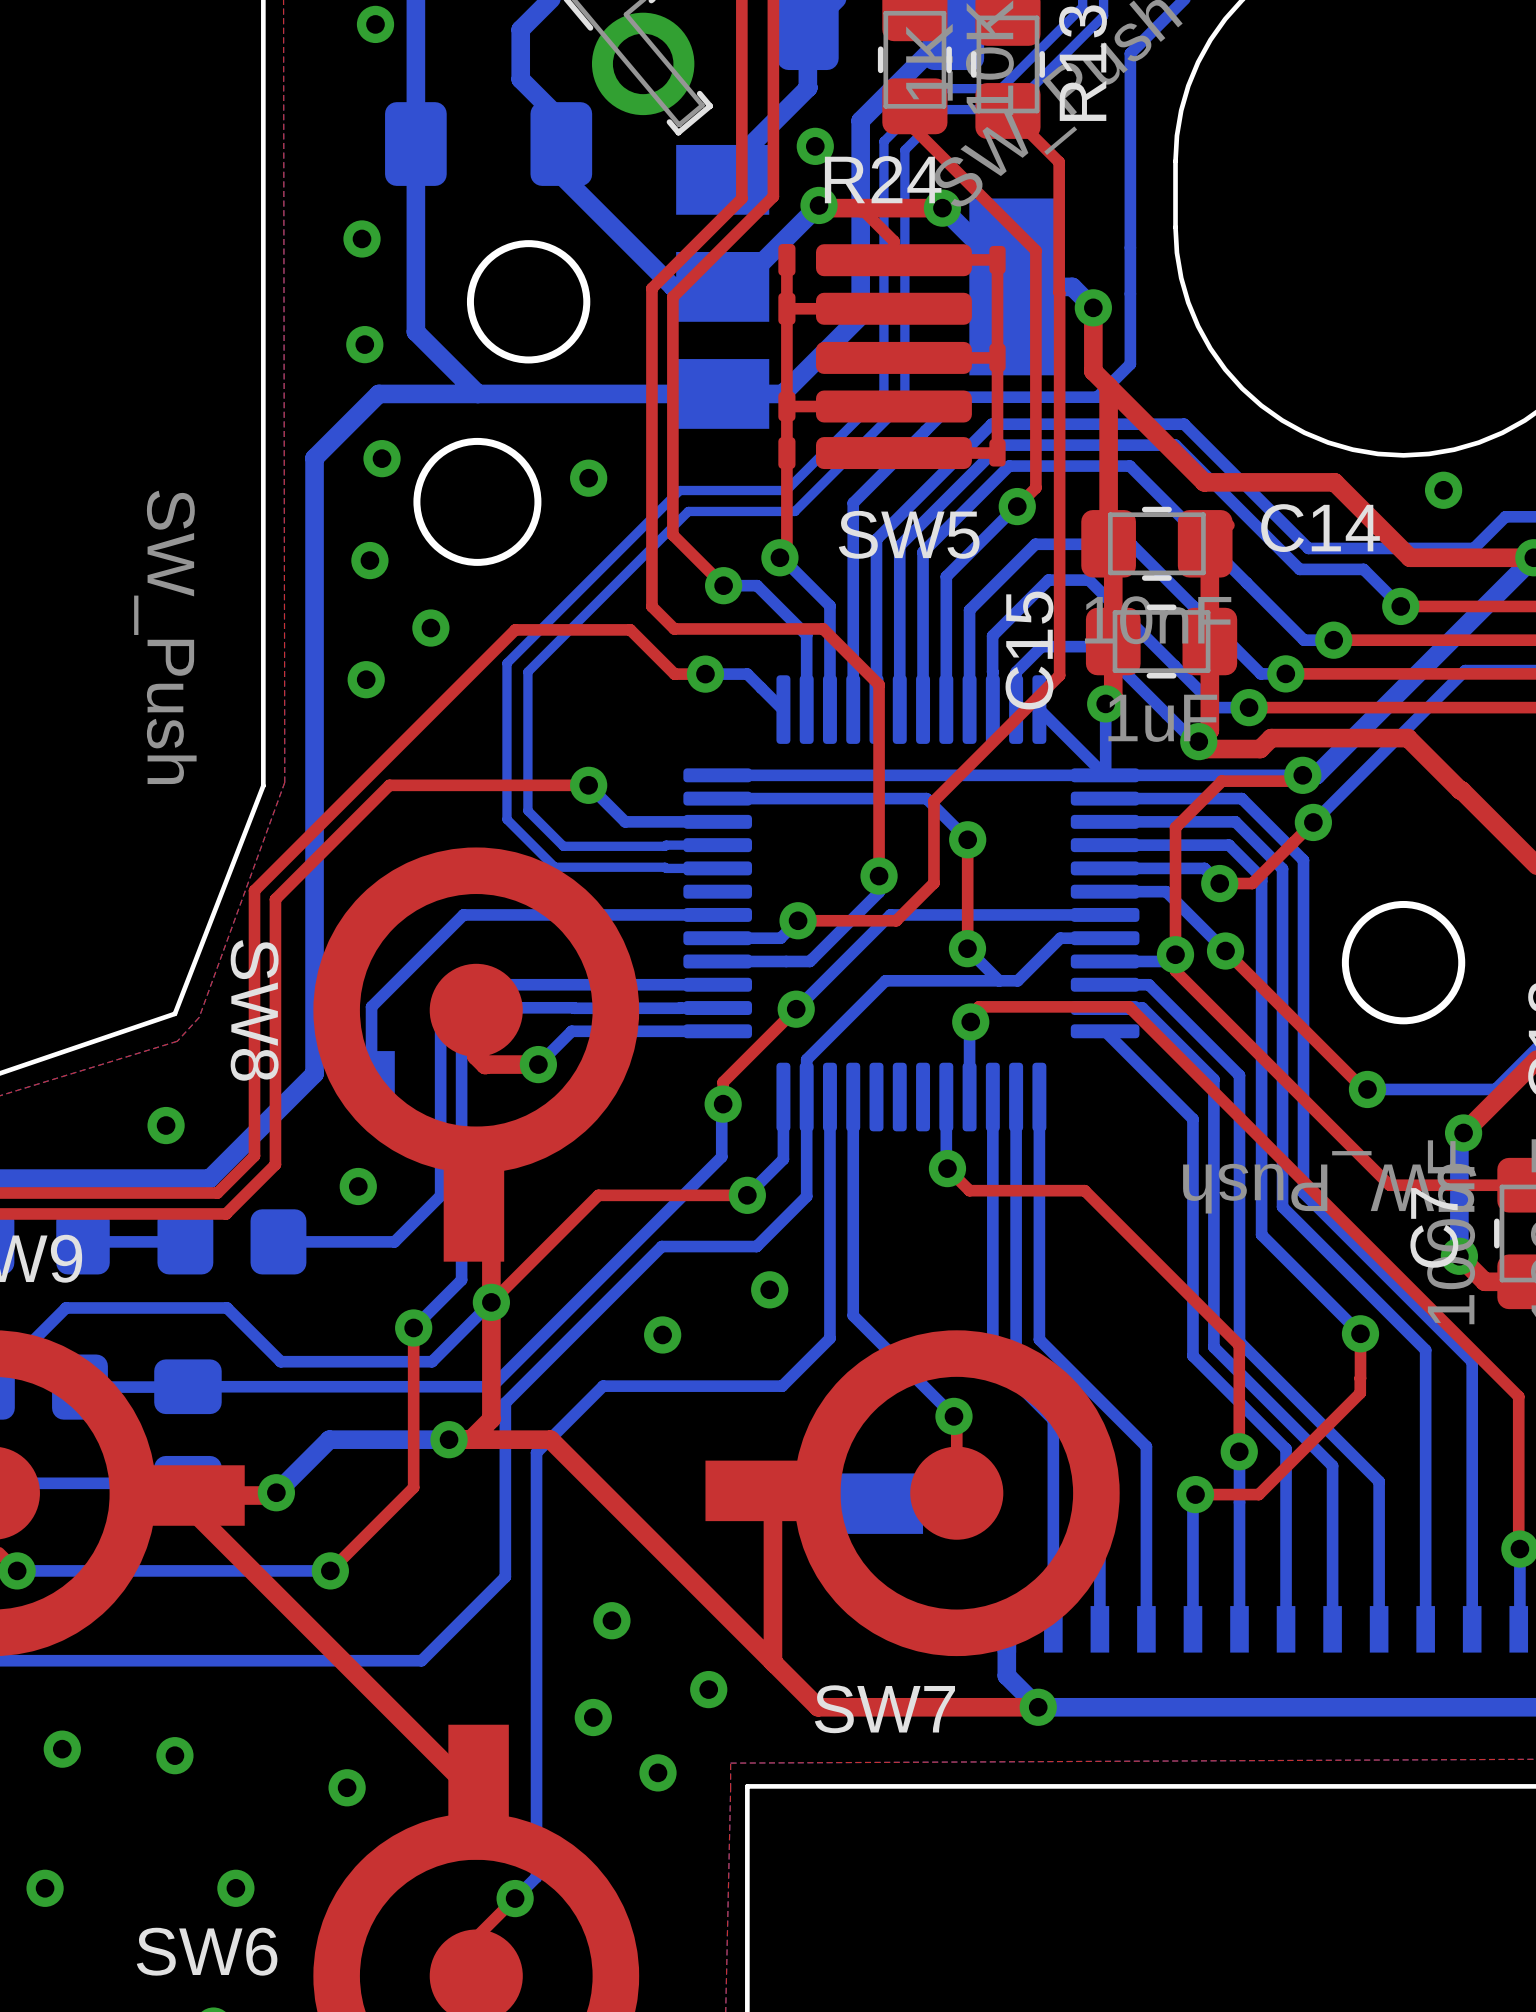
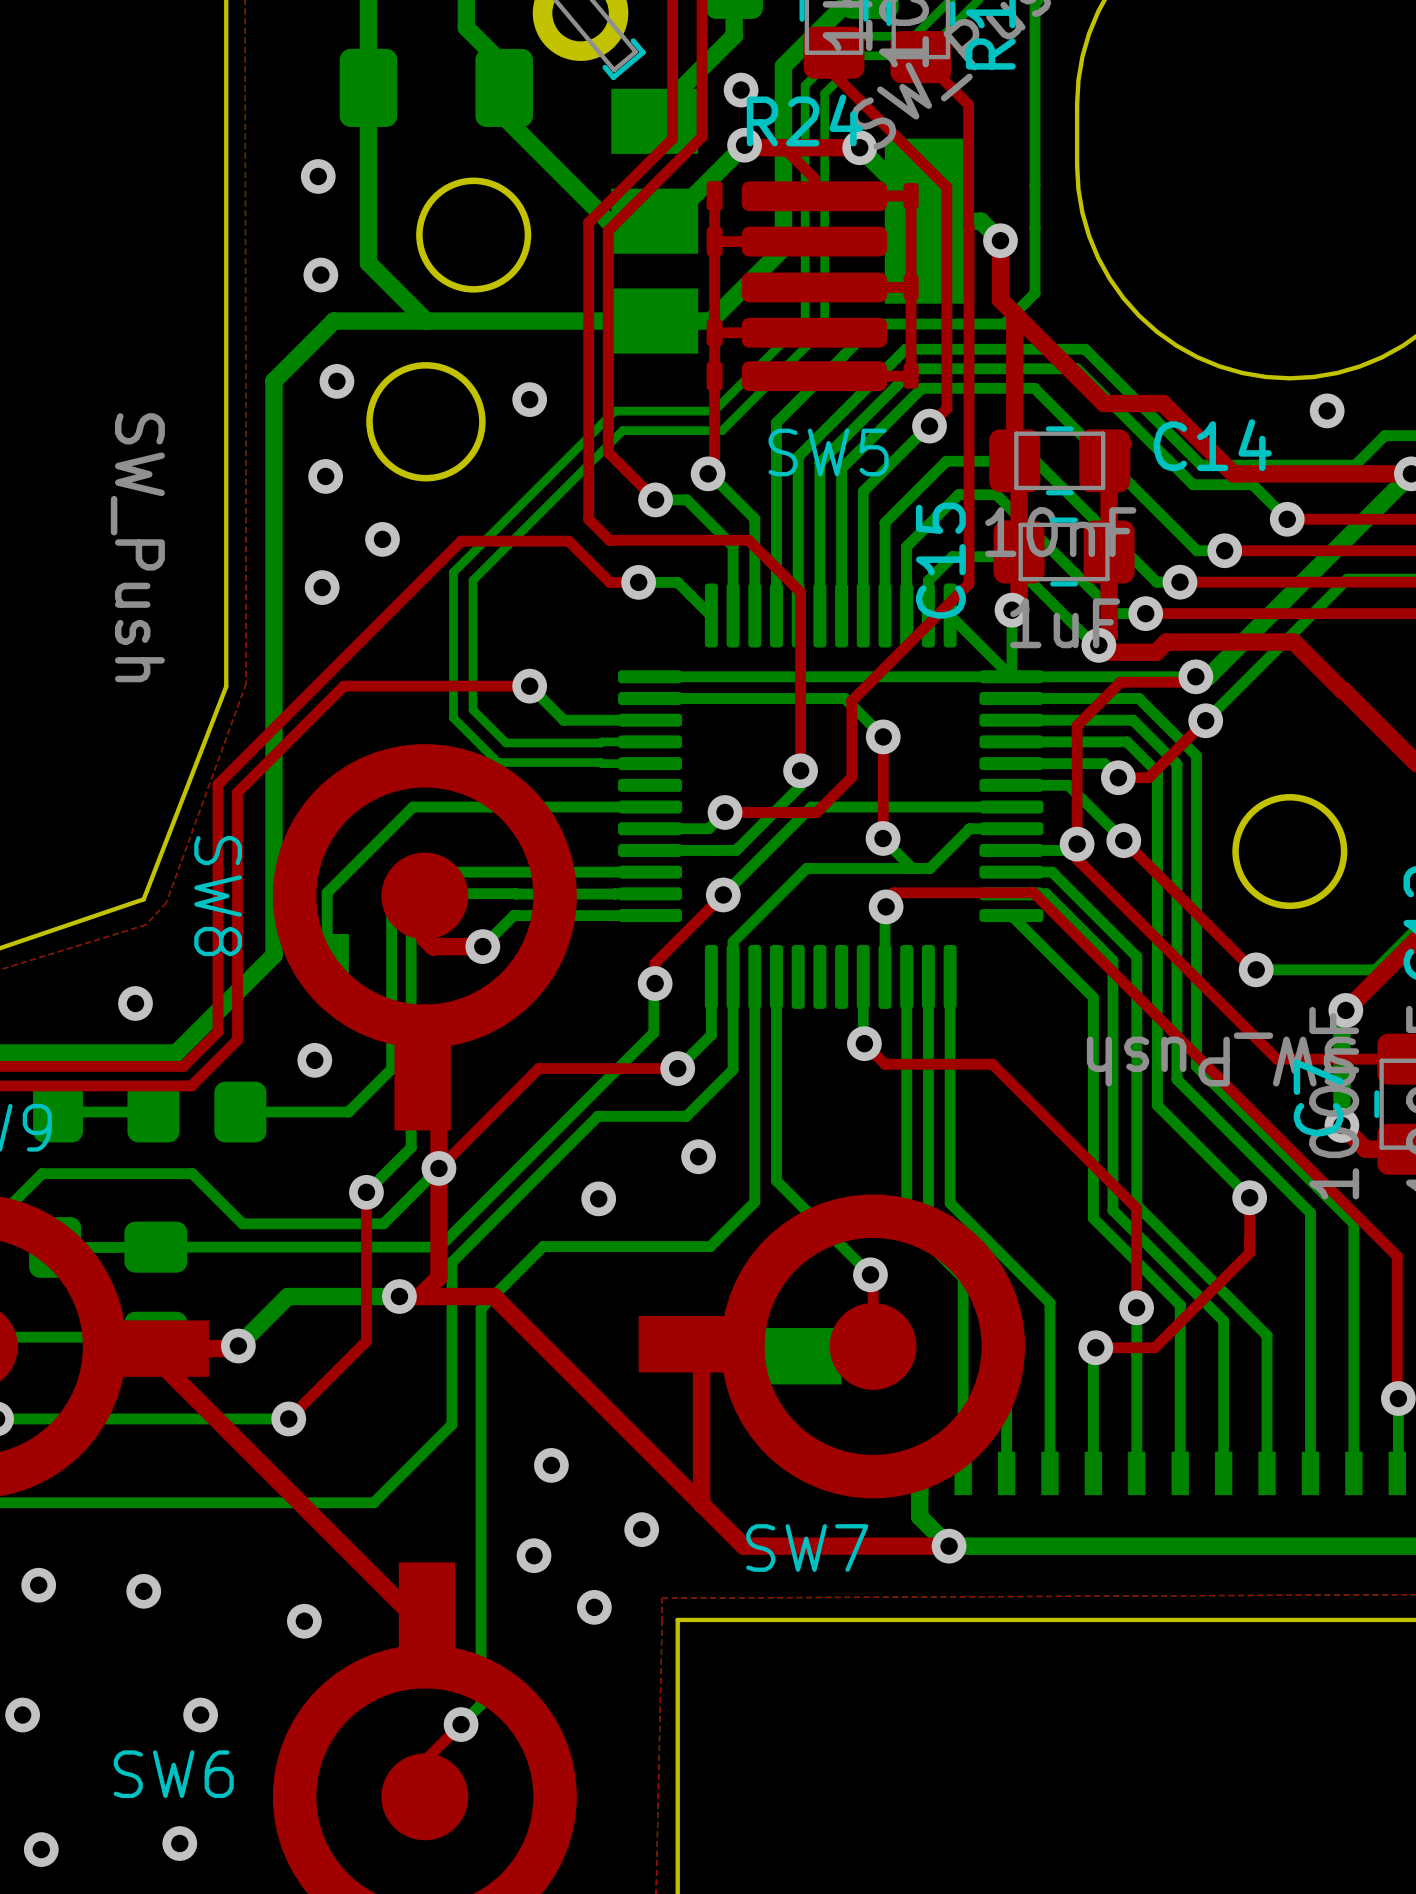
top track: (1267, 482) (1334, 482) (1410, 557) -> (1163, 403) (1233, 473) (1295, 473)

